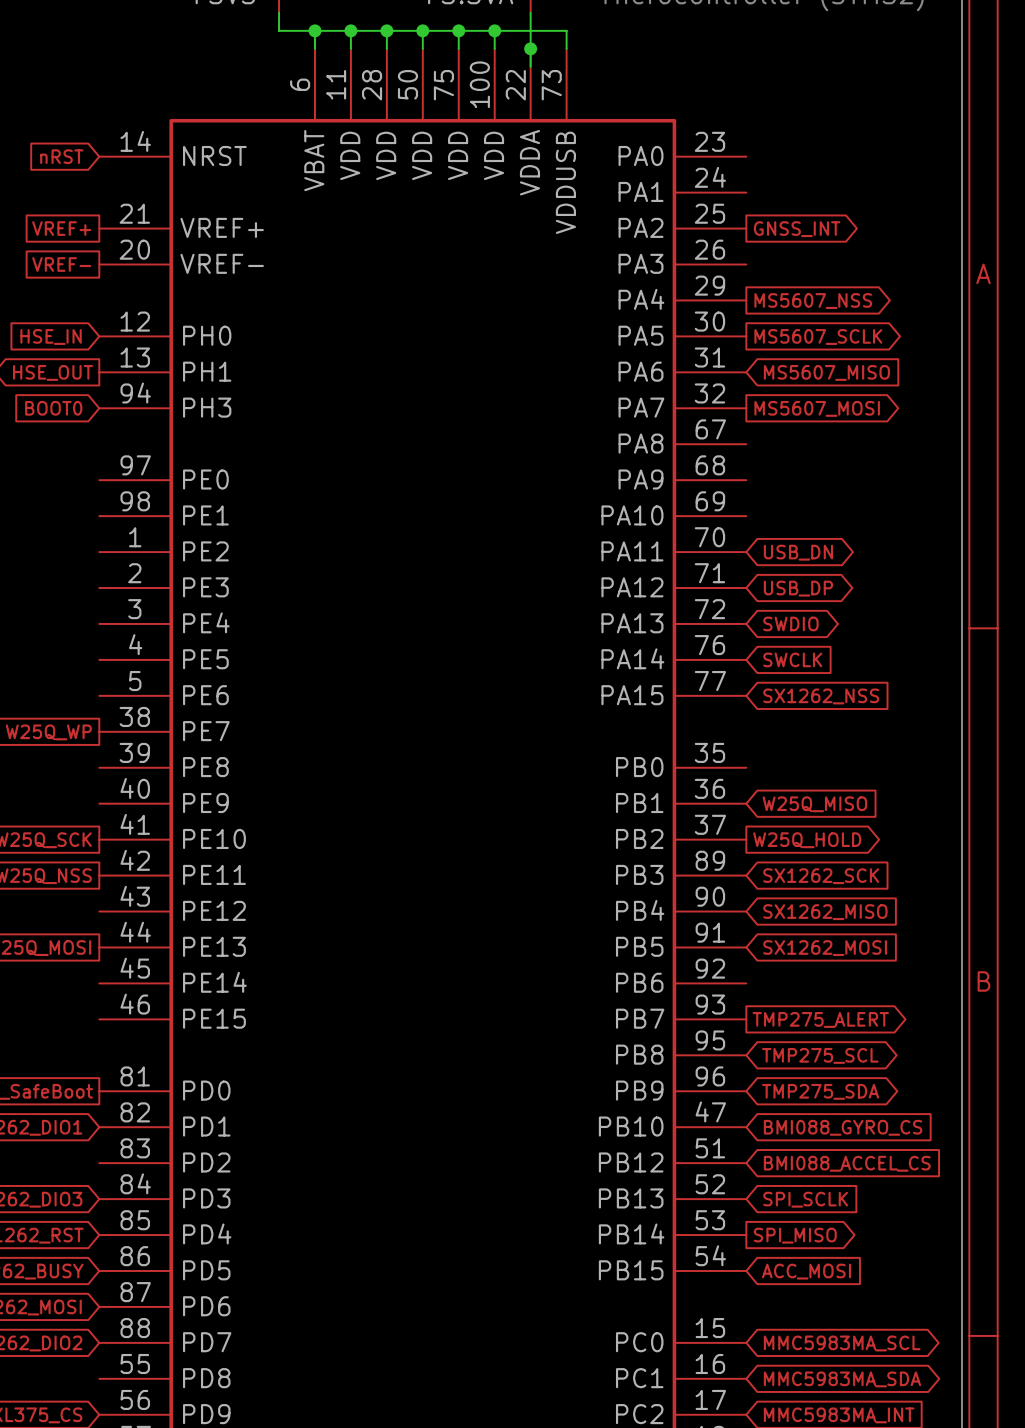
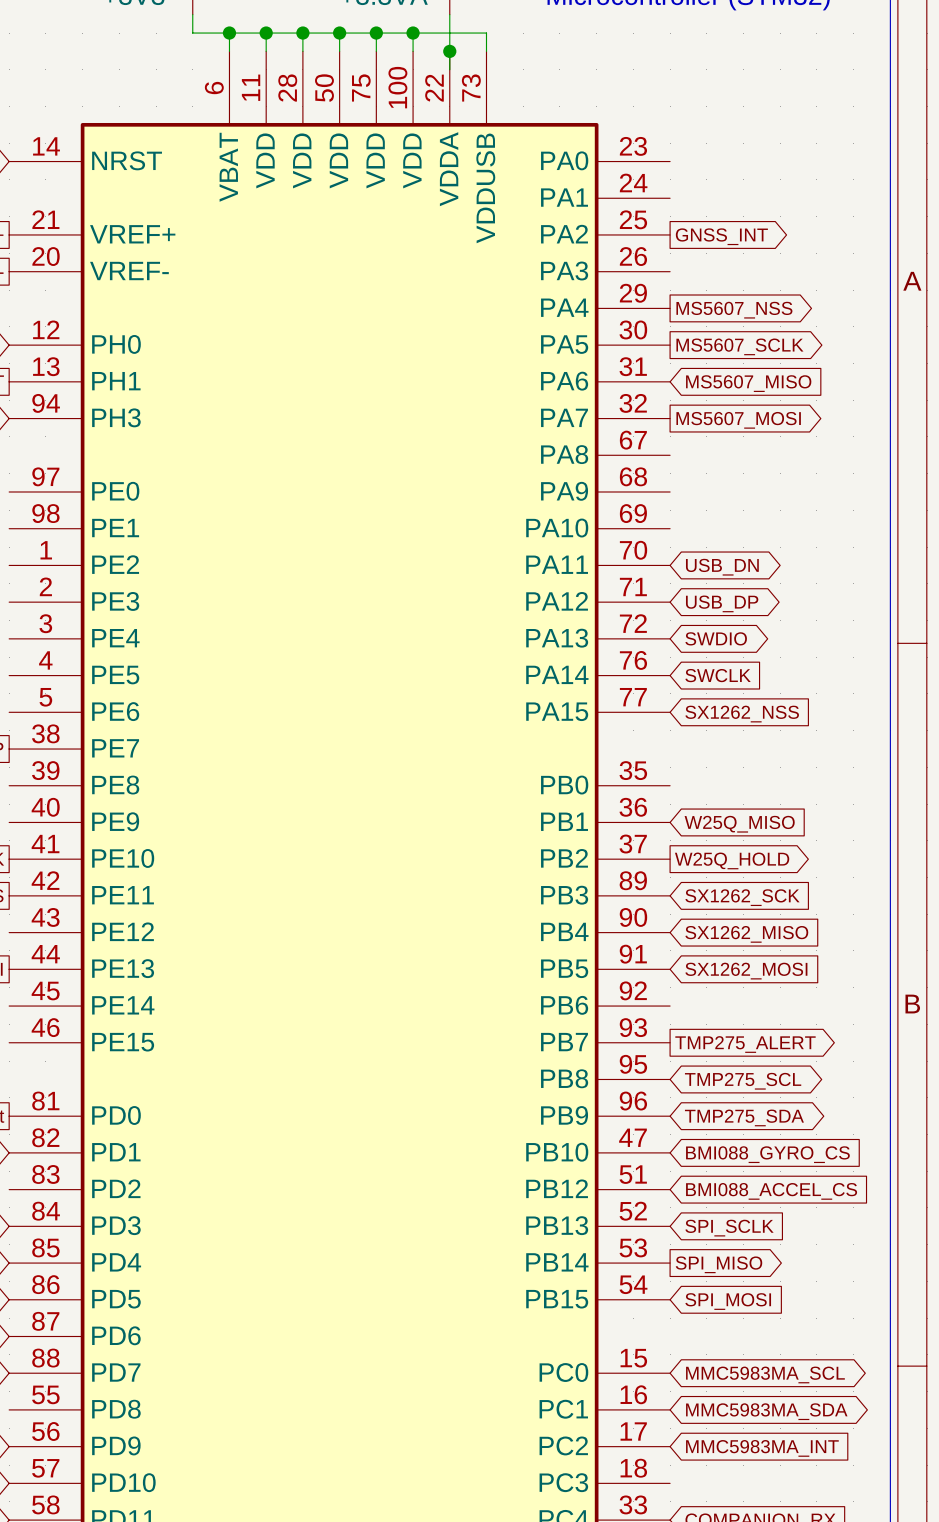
global label: ACC_MOSI (806, 1271) -> SPI_MOSI (728, 1301)

